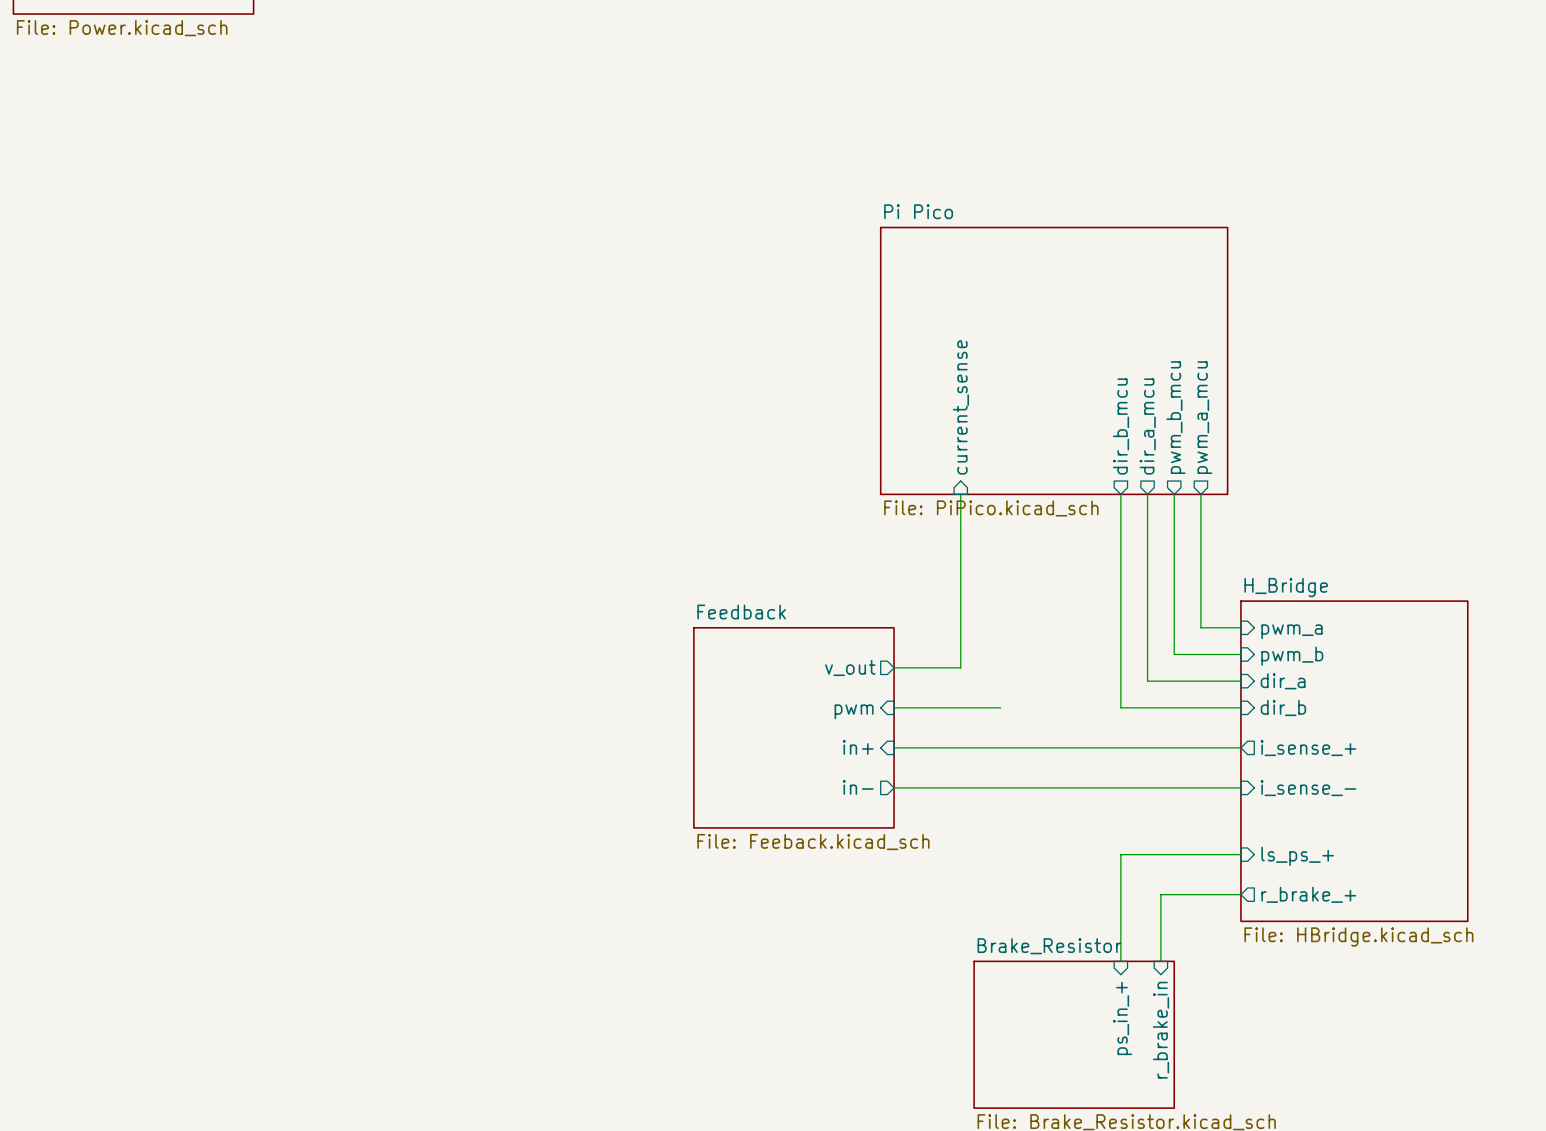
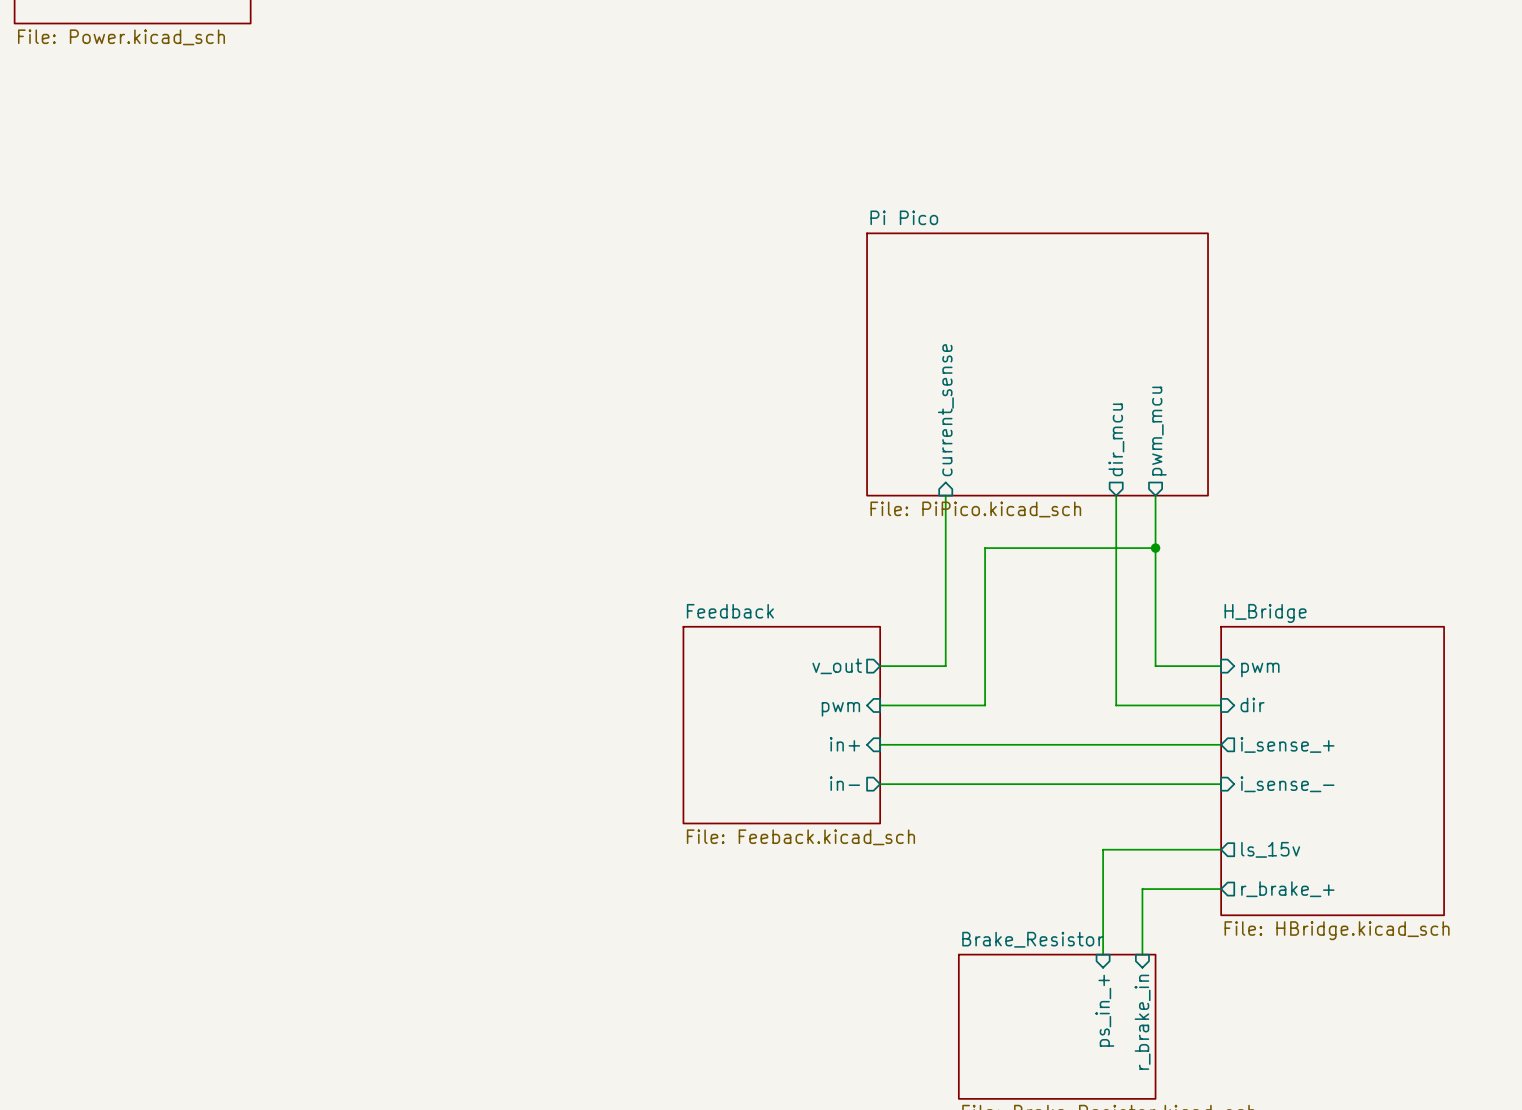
sheet pin: pwm_b_mcu (1175, 417) -> pwm_mcu (1159, 431)
sheet pin: pwm_a_mcu (1204, 417) -> none
sheet pin: dir_b_mcu (1121, 426) -> none
sheet pin: dir_a_mcu (1147, 426) -> none
sheet pin: none -> dir_mcu (1116, 439)
wire: (1120, 494) (1120, 707) (1134, 707) -> (1116, 495) (1116, 705)
wire: (1147, 494) (1147, 681) (1240, 681) -> none
wire: (1200, 494) (1200, 627) (1240, 627) -> none
wire: none -> (1155, 548) (985, 548) (985, 705)
junction: none -> (1155, 548)
sheet pin: pwm_a (1291, 631) -> none
wire: (1174, 654) (1240, 654) -> (1155, 653) (1155, 666) (1221, 666)
sheet pin: pwm_b (1292, 656) -> pwm (1260, 669)
sheet pin: dir_a (1283, 681) -> none
sheet pin: dir_b (1283, 707) -> dir (1252, 704)
sheet H_Bridge: File: HBridge.kicad_sch (1354, 761) -> none
sheet H_Bridge: none -> File: HBridge.kicad_sch (1332, 771)
sheet pin shape: input (1297, 856) -> output (1270, 849)
sheet pin: ls_ps_+ (1297, 856) -> ls_15v (1270, 849)

